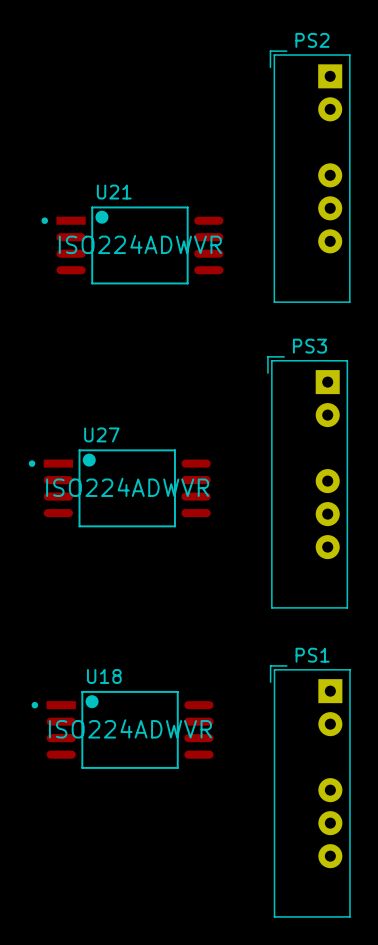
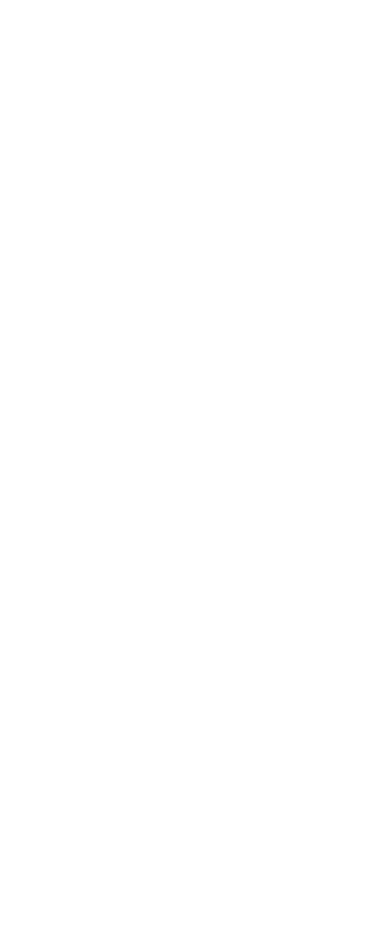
PS2: (310, 176) -> none
U21: ISO224ADWVR (132, 245) -> none
PS3: (307, 482) -> none
U27: ISO224ADWVR (119, 488) -> none
U18: ISO224ADWVR (122, 729) -> none
PS1: (310, 791) -> none

